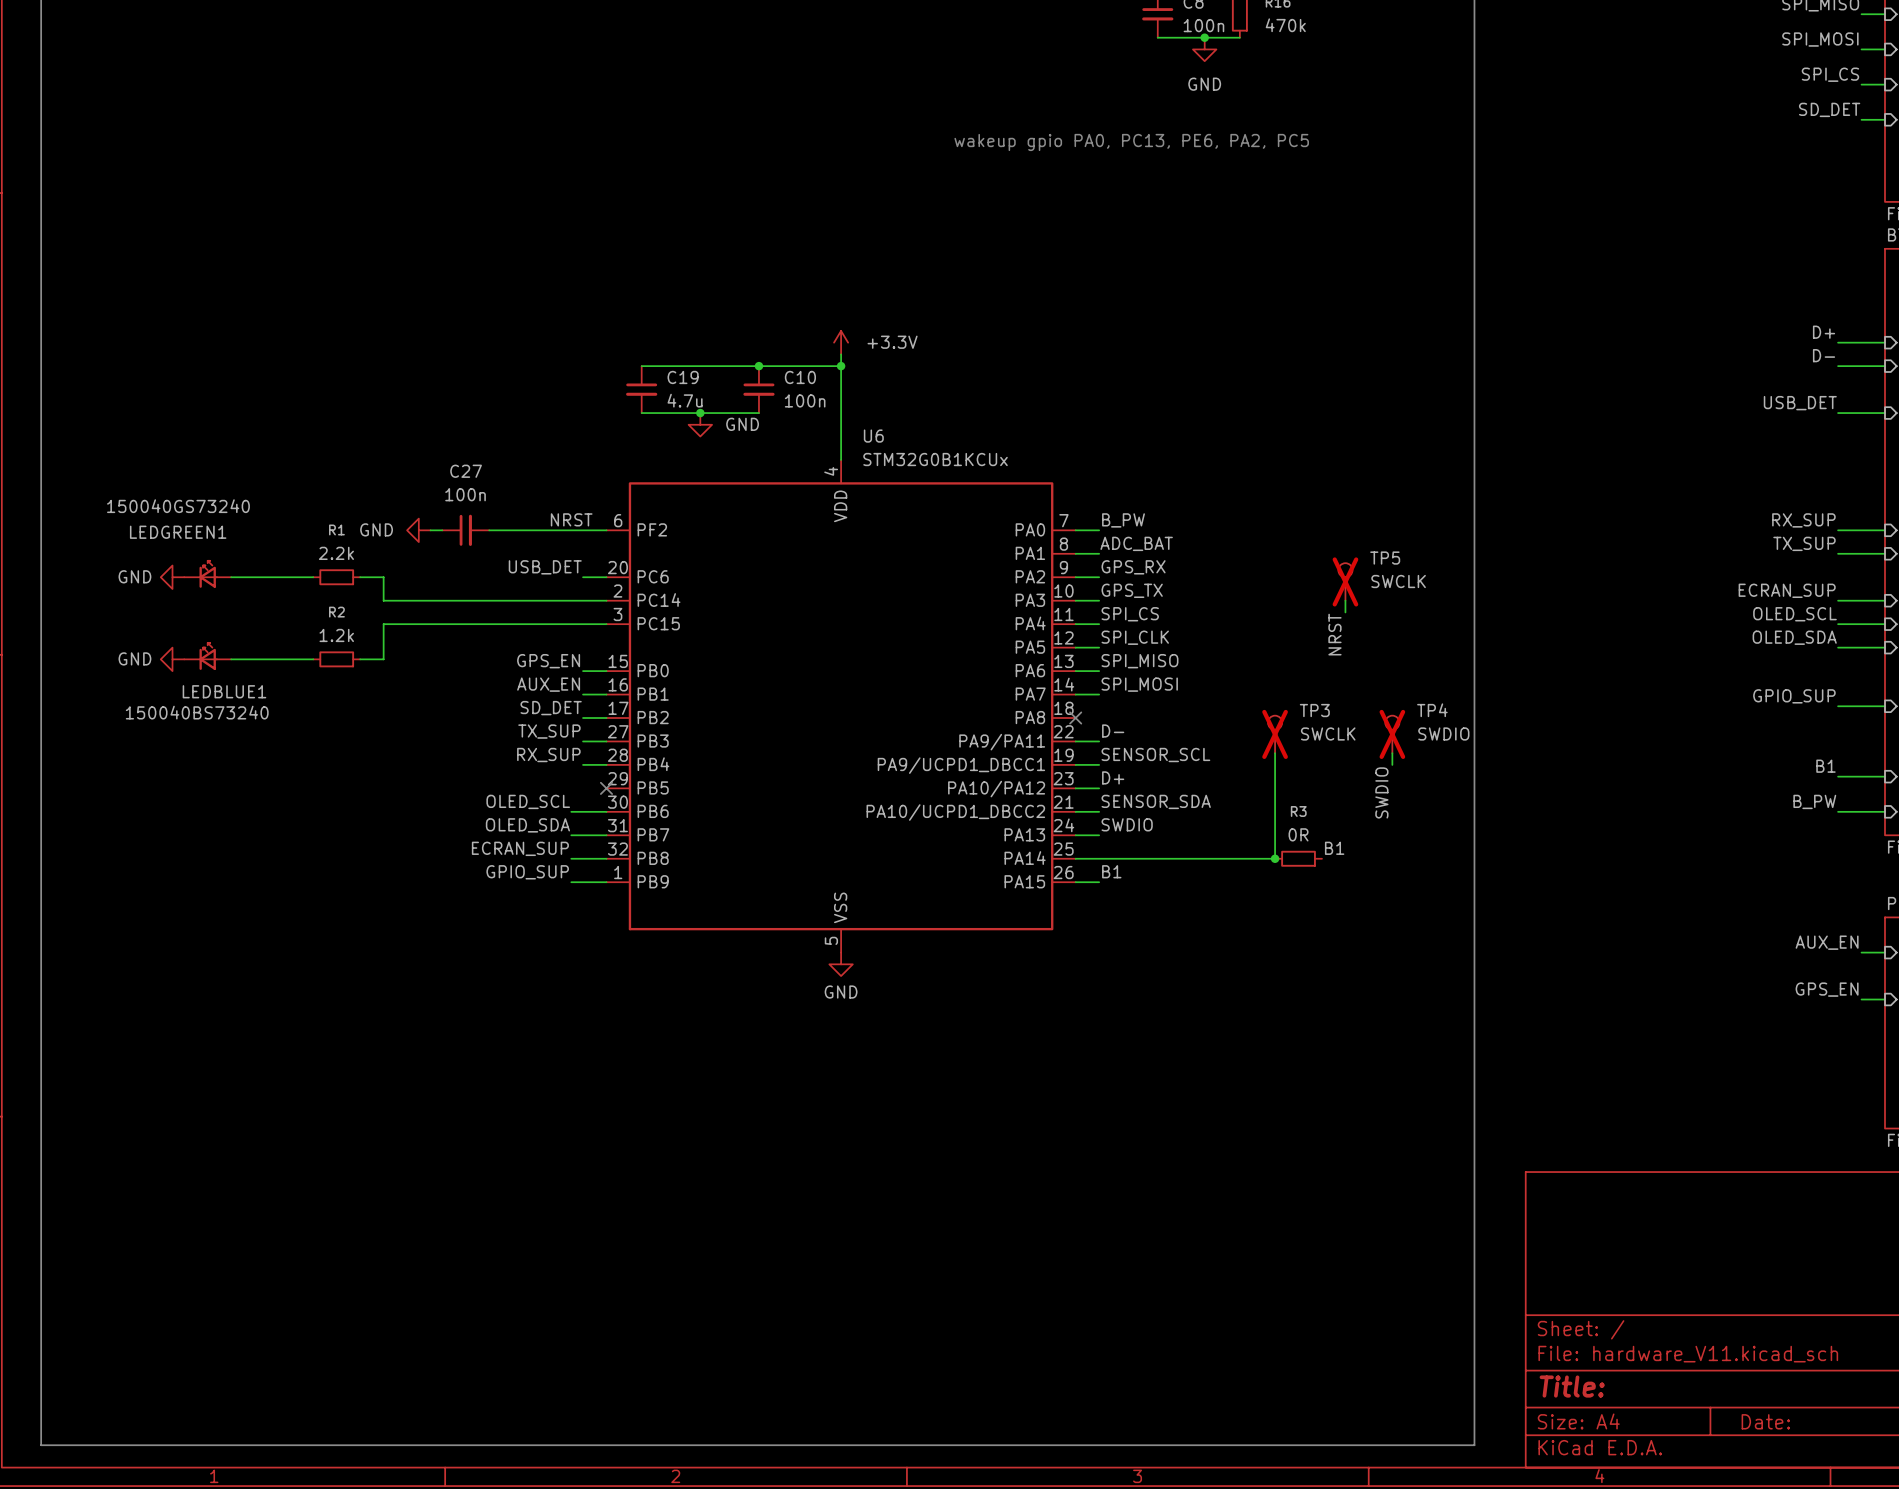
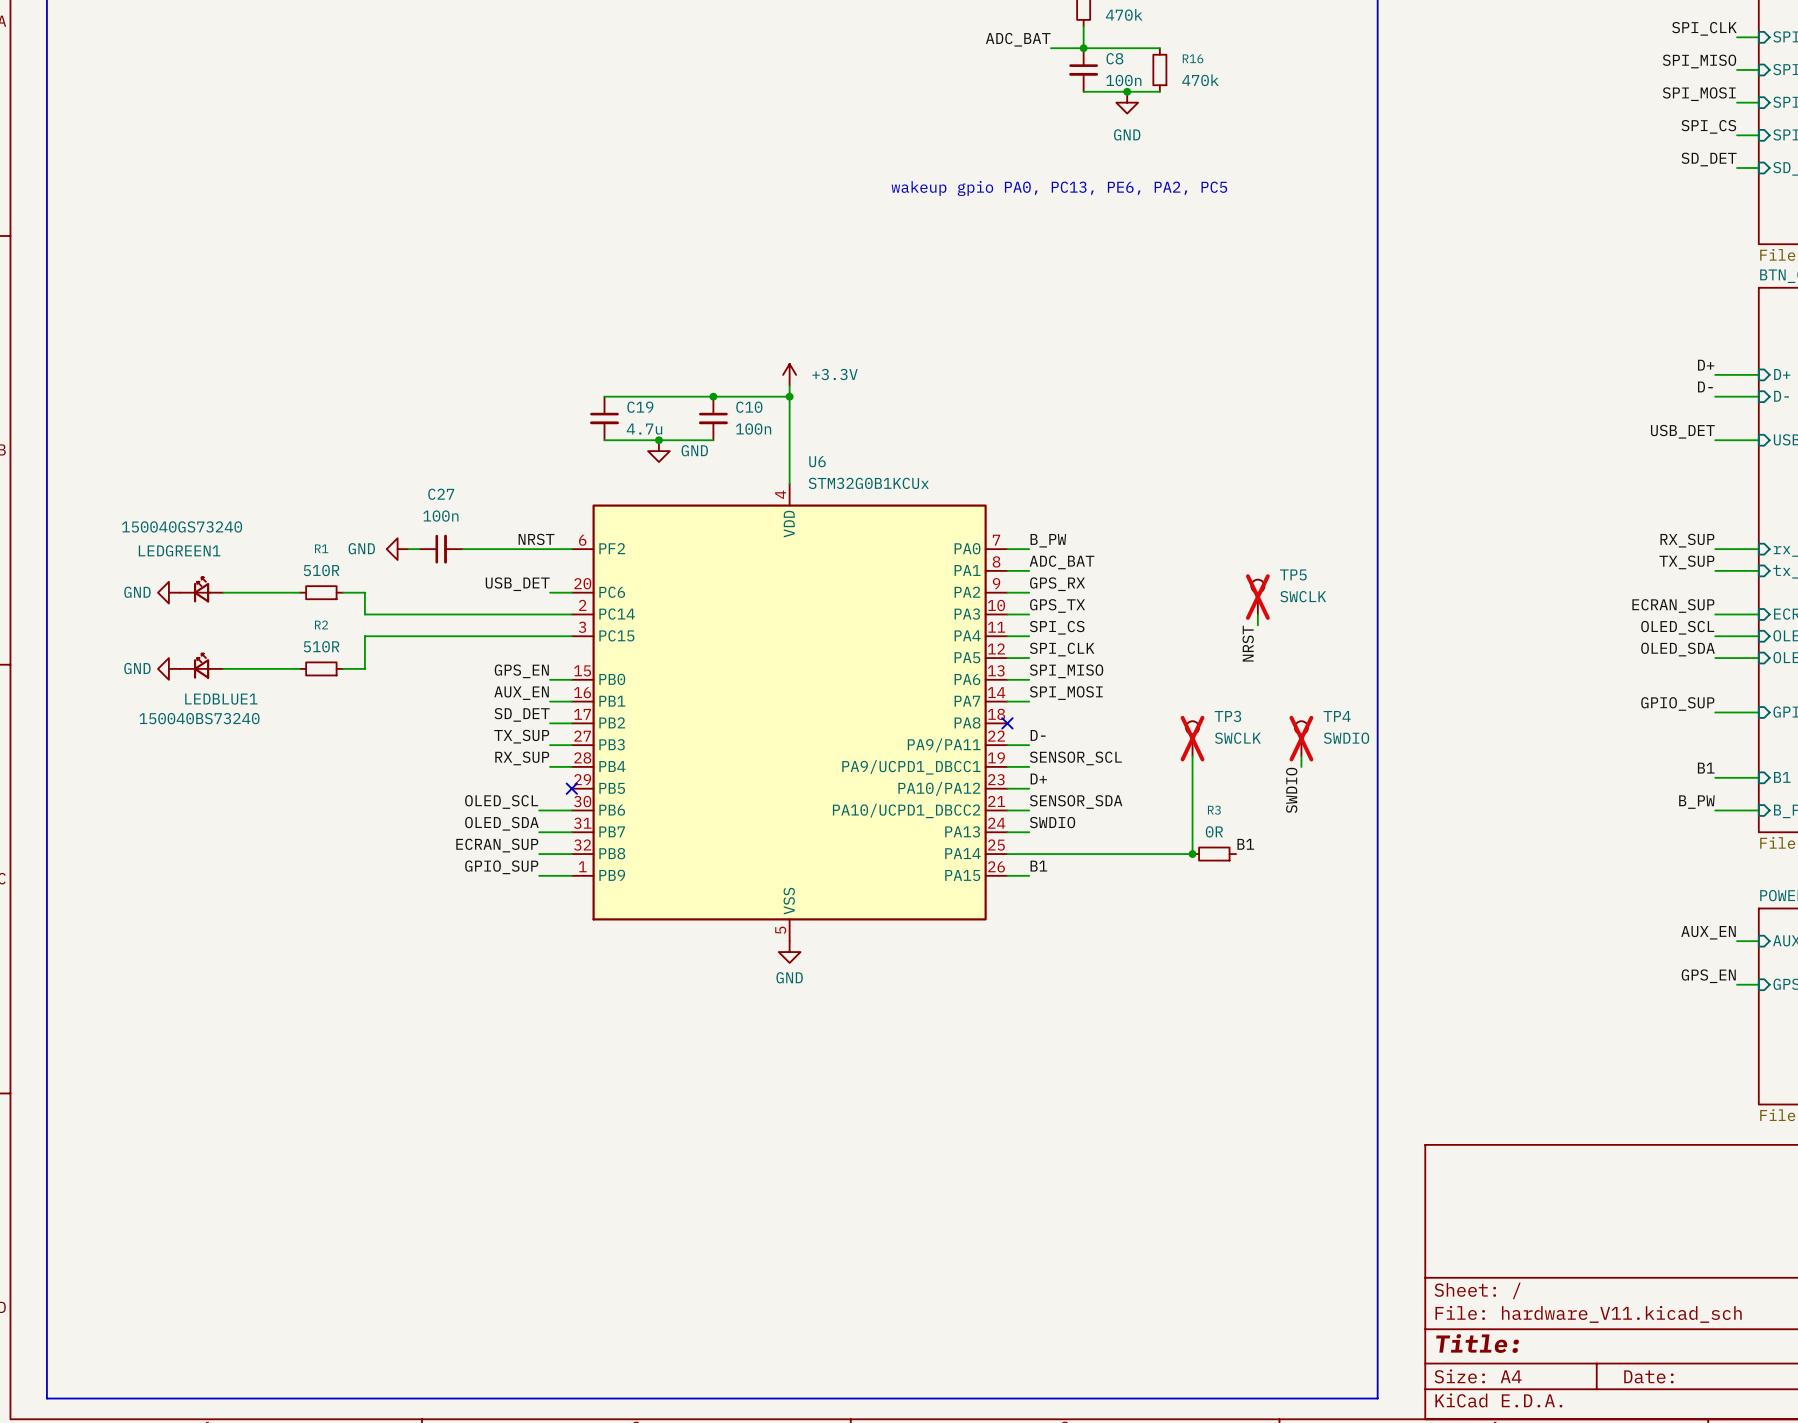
R1 value: 2.2k (336, 553) -> 510R (321, 570)
R2 value: 1.2k (336, 635) -> 510R (321, 646)

